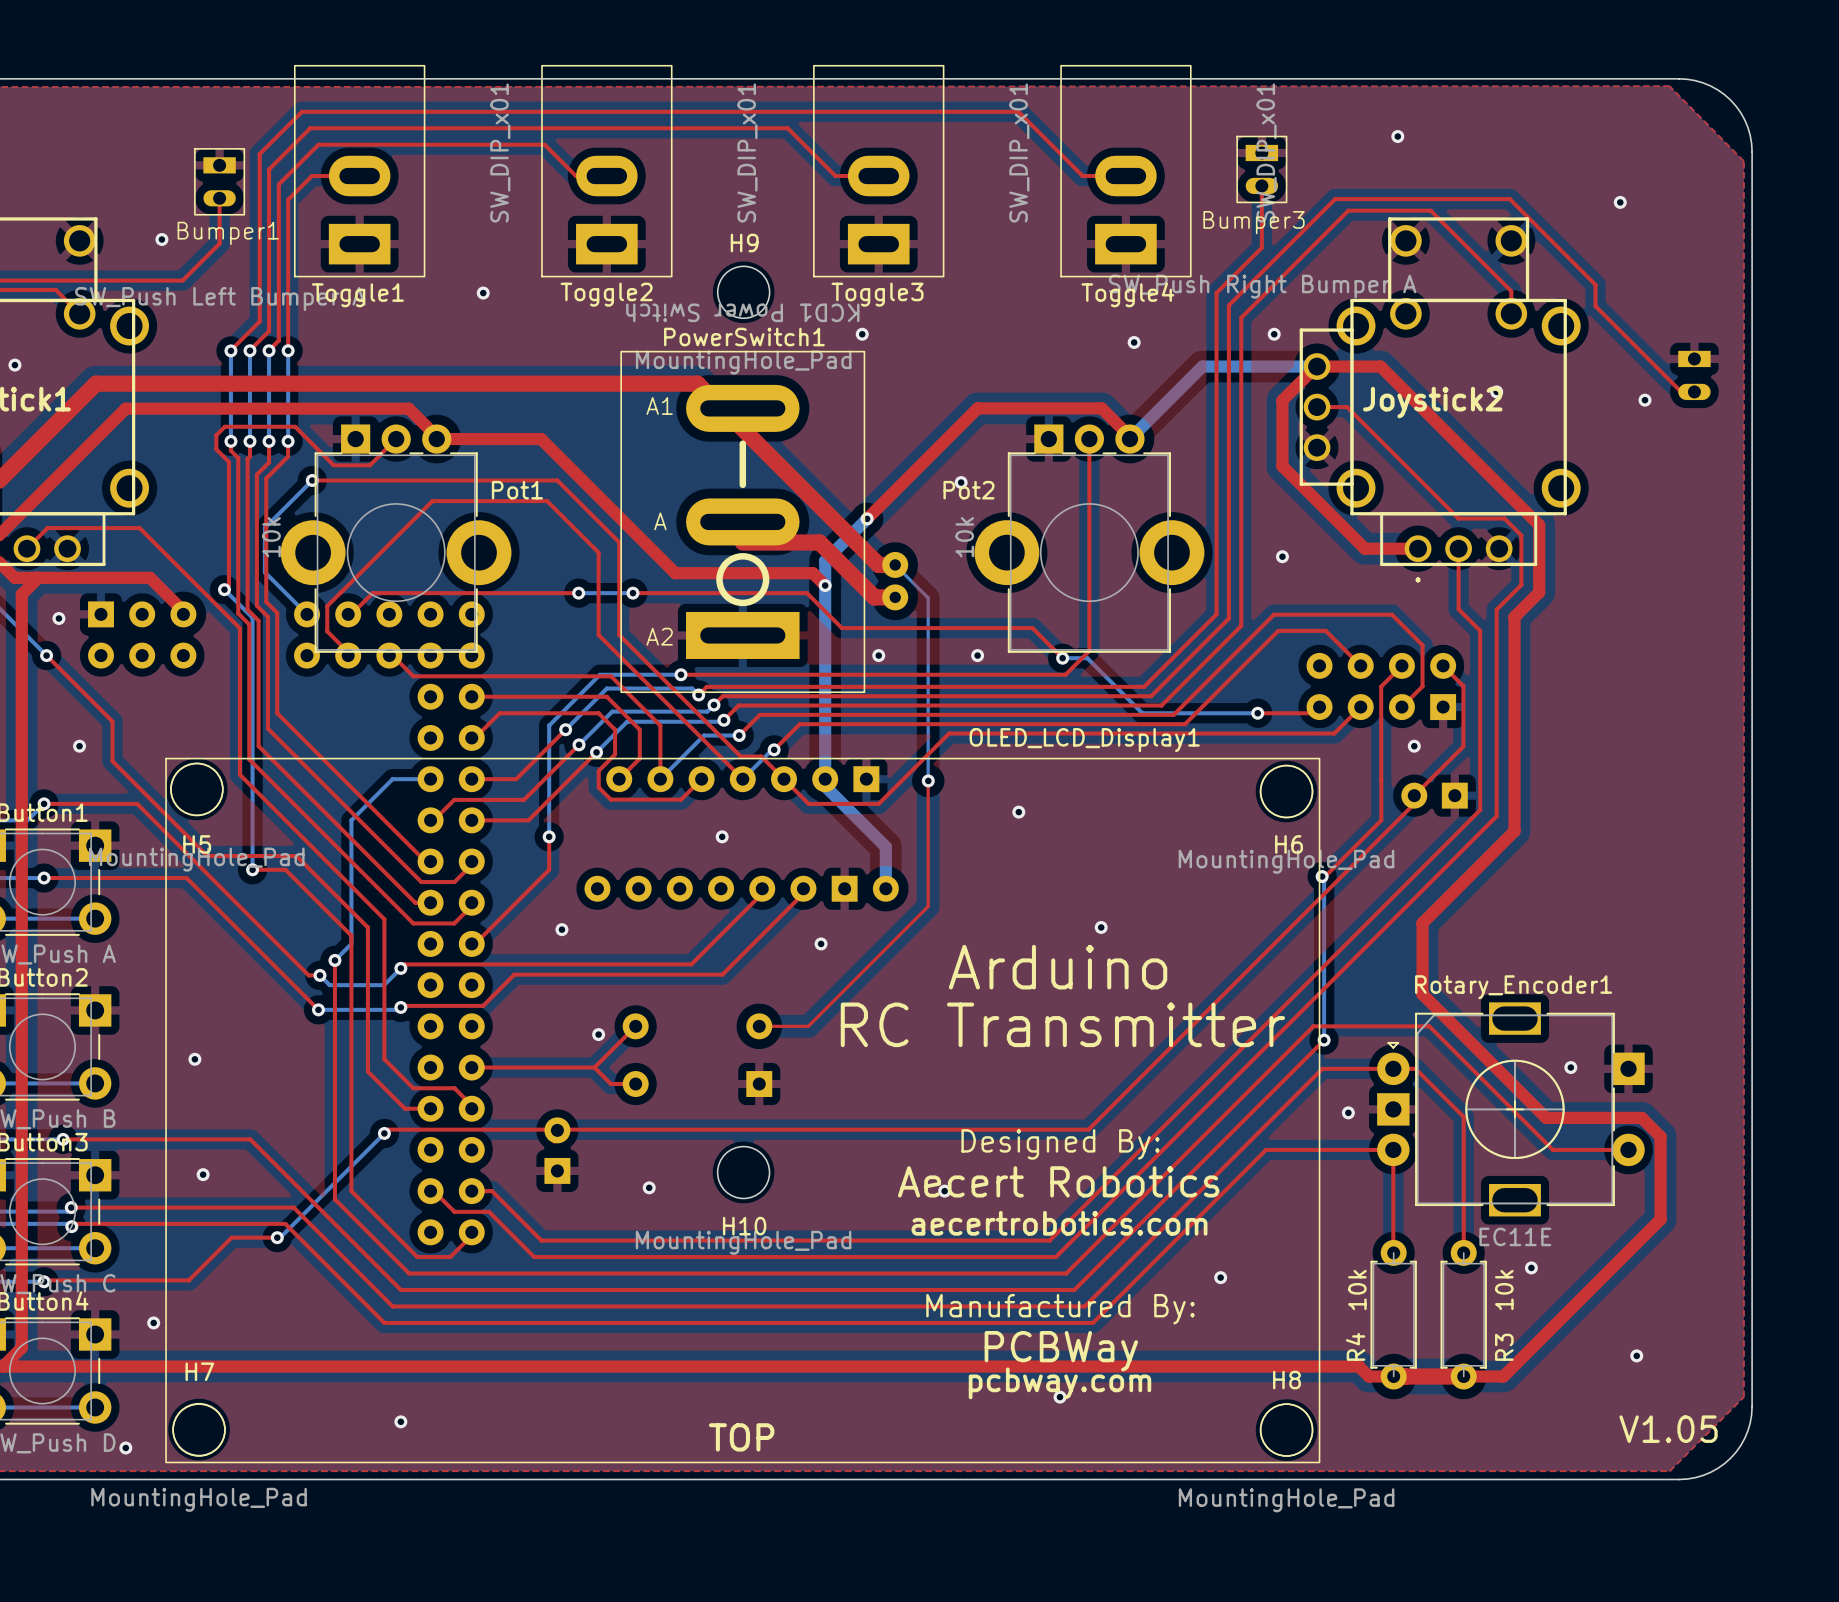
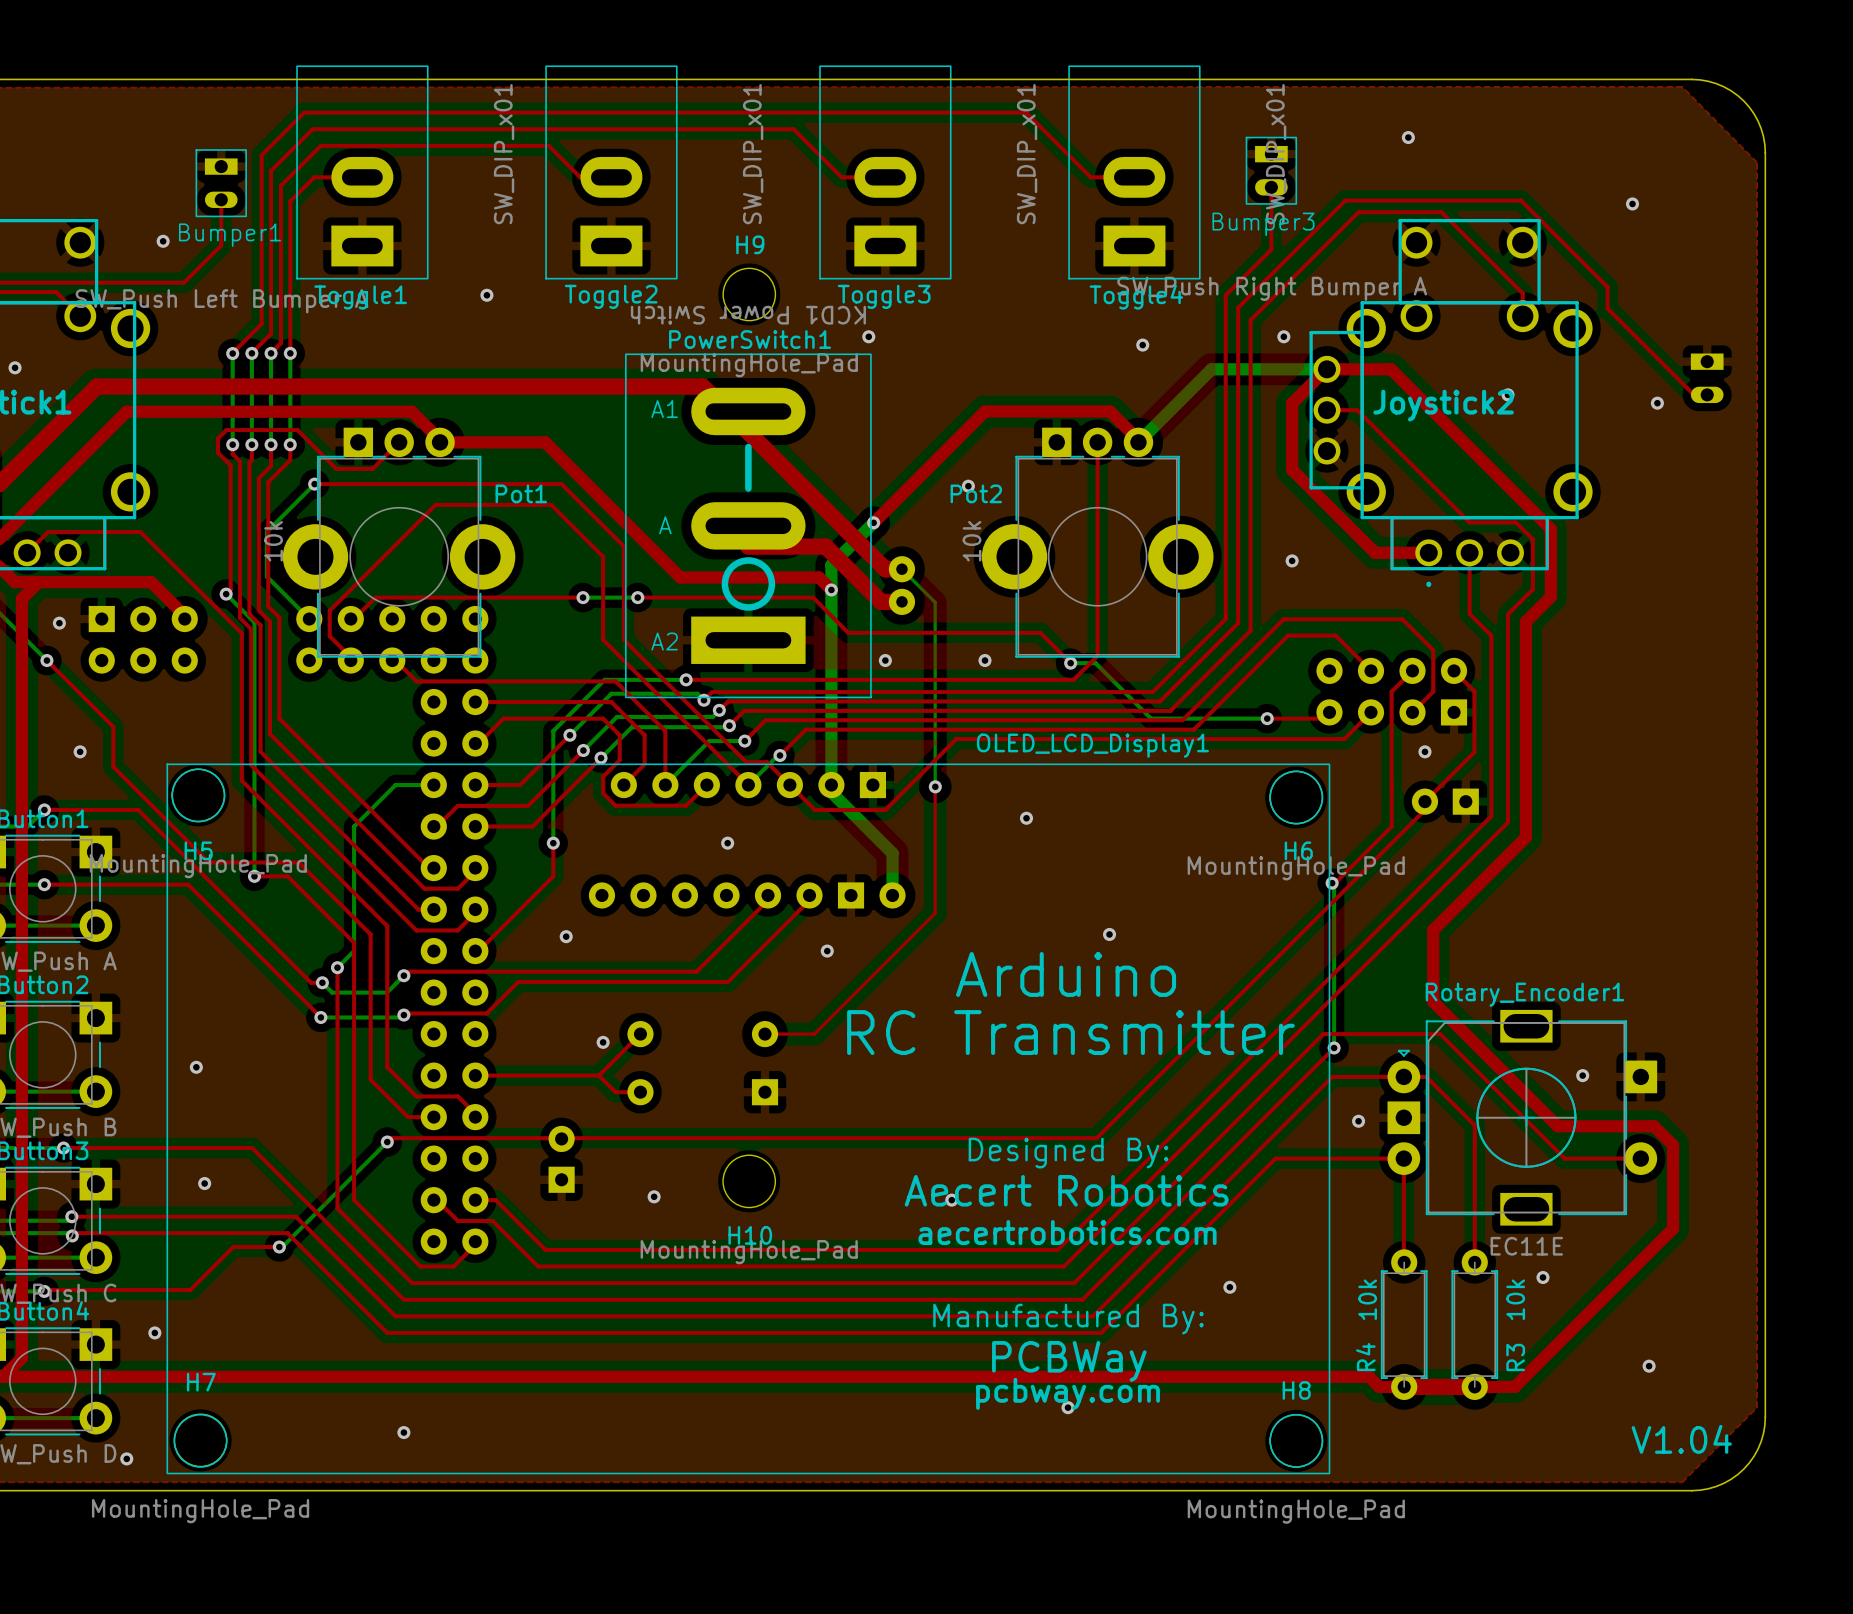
text: V1.05 (1668, 1429) -> V1.04 (1681, 1439)
text: TOP (741, 1437) -> none

